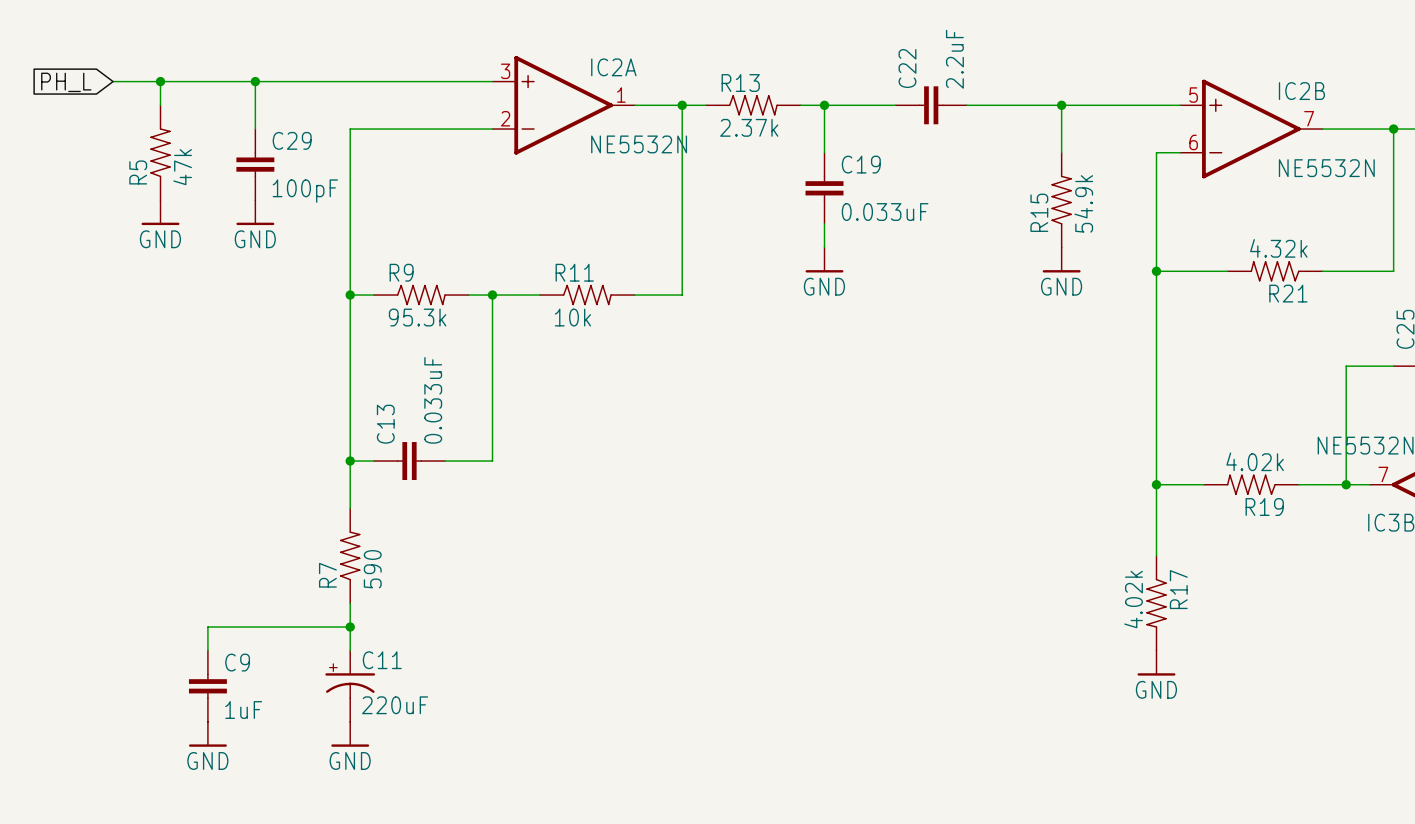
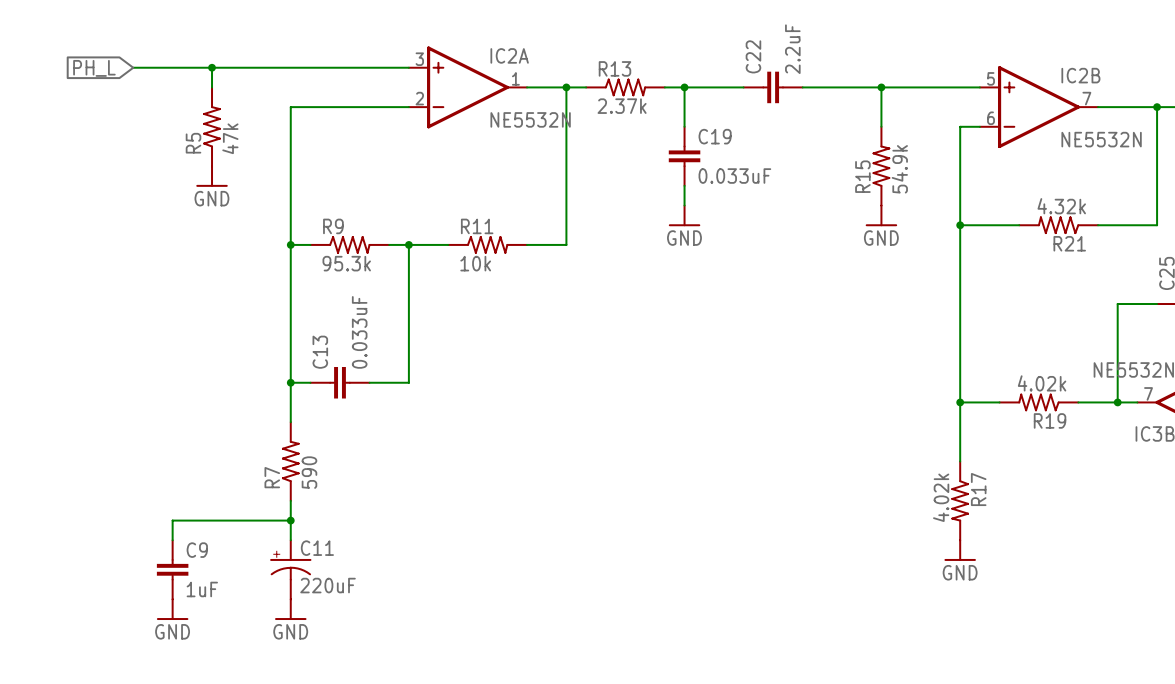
wire: (113, 81) (160, 81) (160, 105) -> none
junction: (160, 81) -> none
global label position: PH_L (66, 82) -> PH_L (94, 68)
R5 position: (160, 152) -> (212, 126)
C29: 100pF (255, 164) -> none
power symbol: GND (160, 212) -> none

